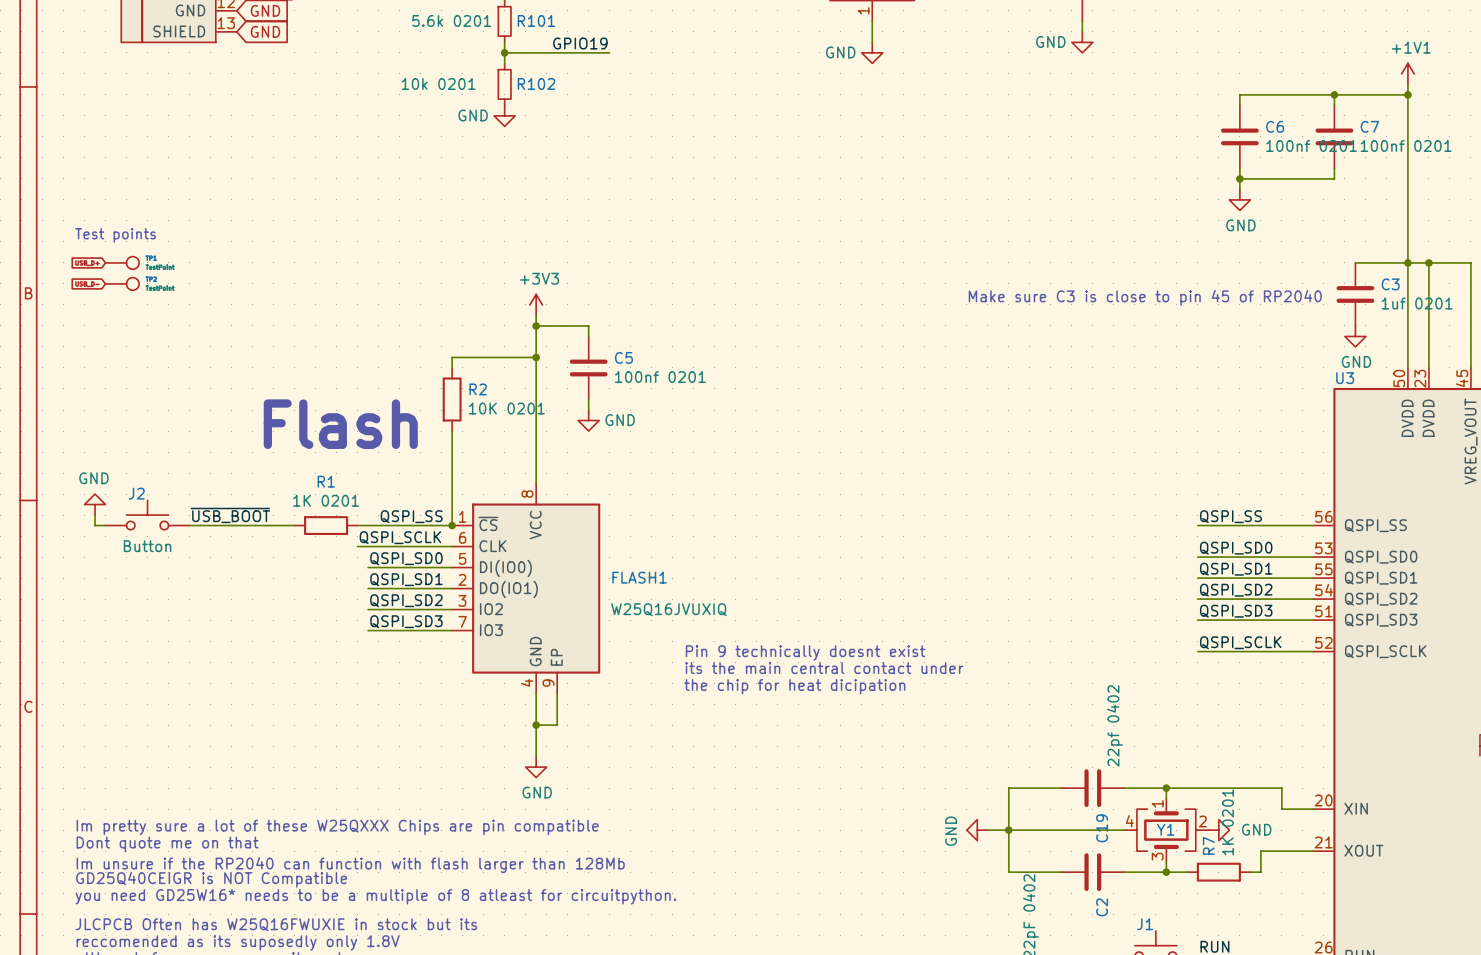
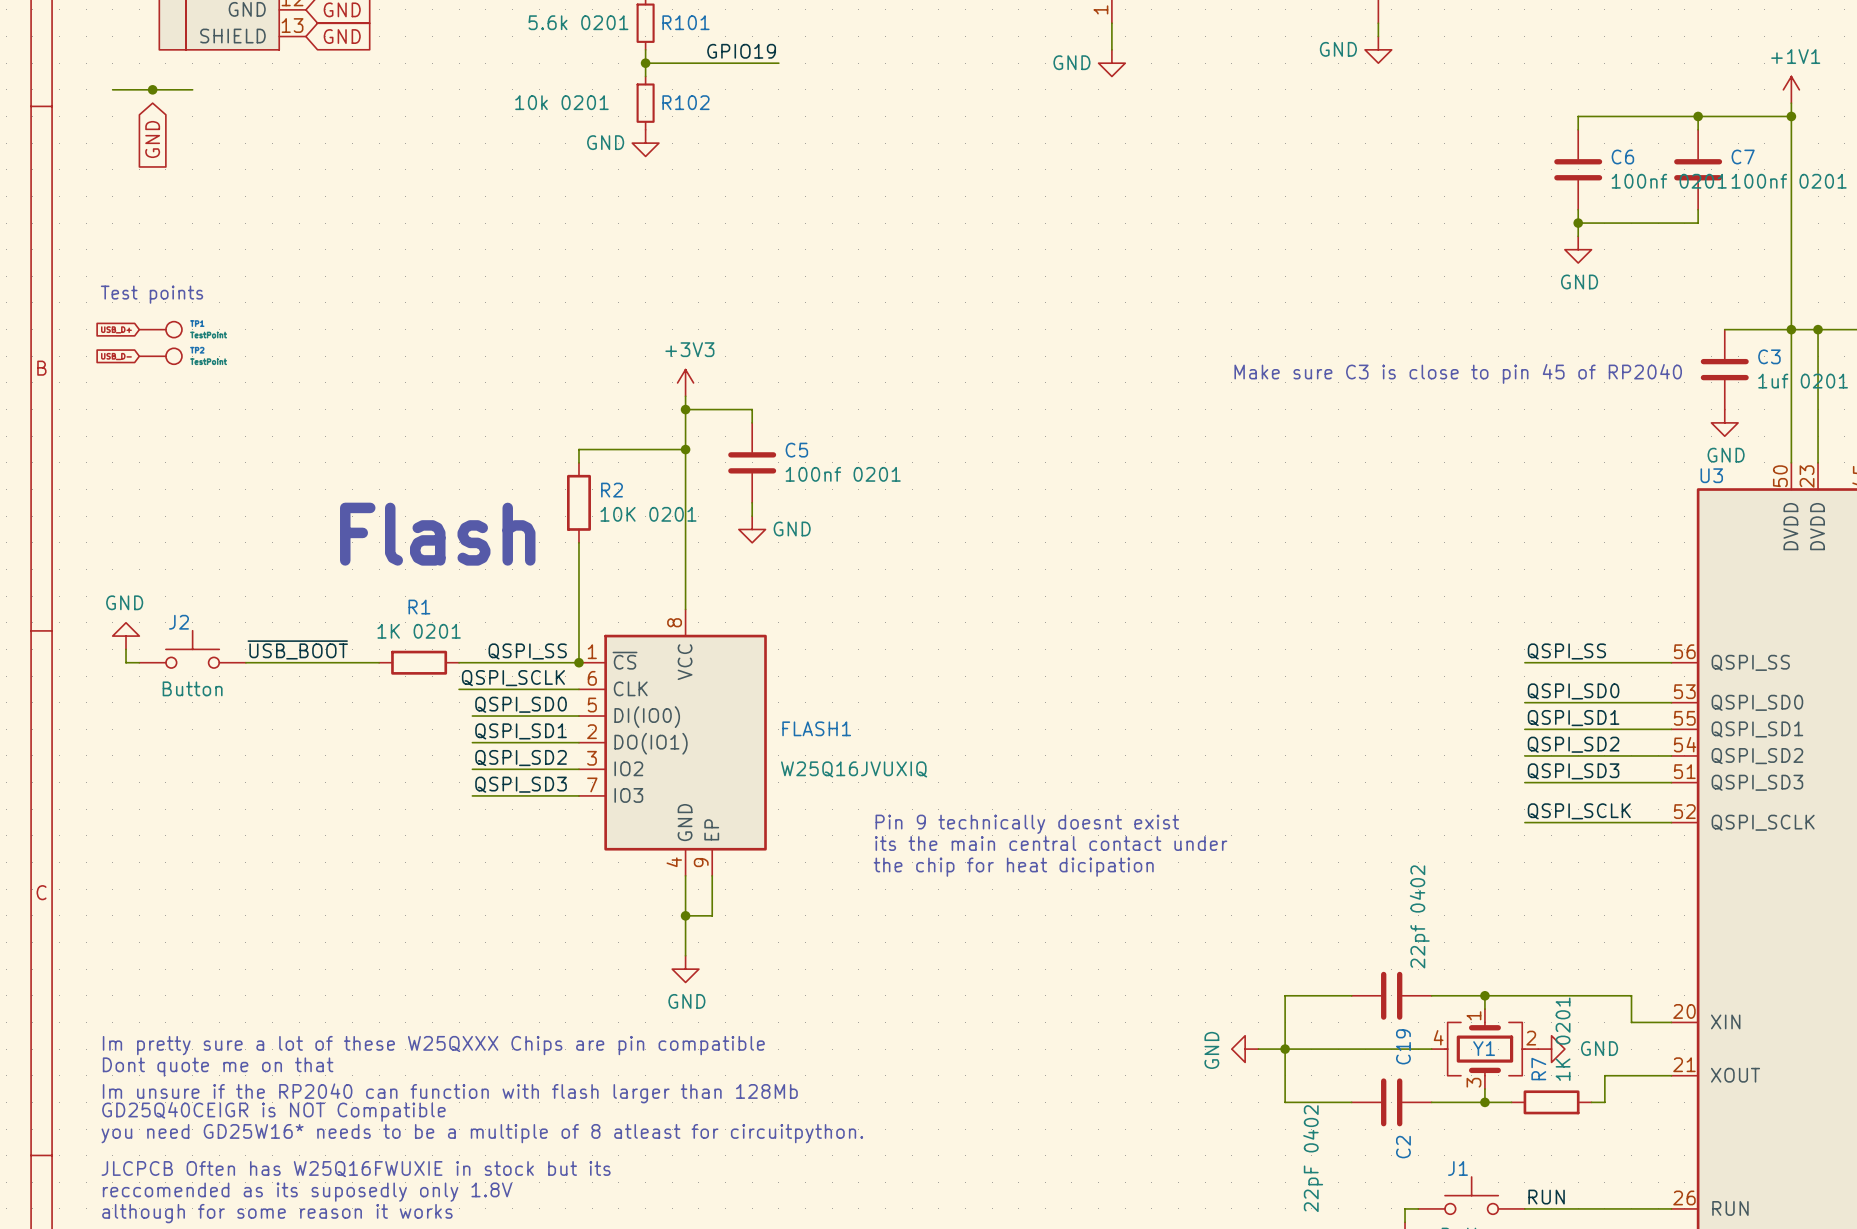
wire: none -> (112, 89) (192, 89)
junction: none -> (152, 89)
global label: none -> GND (152, 139)

